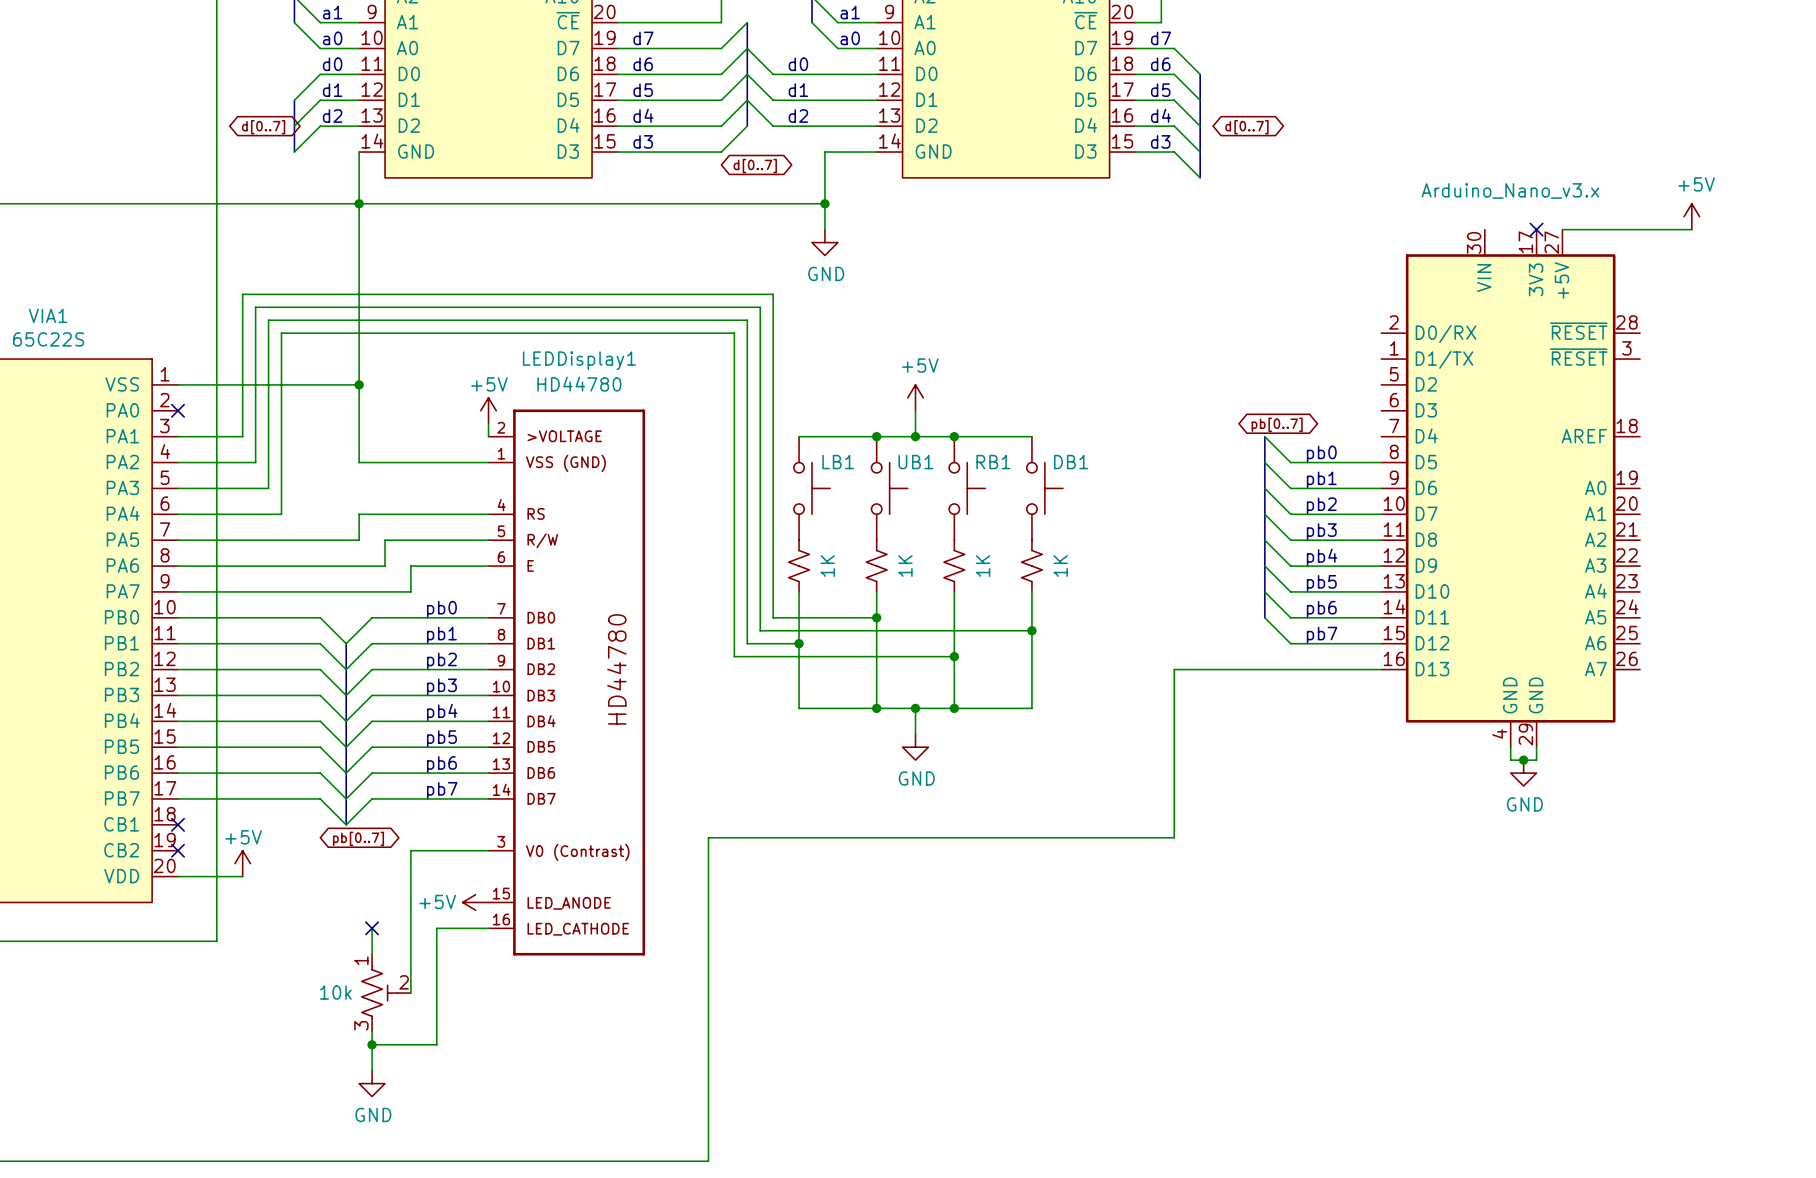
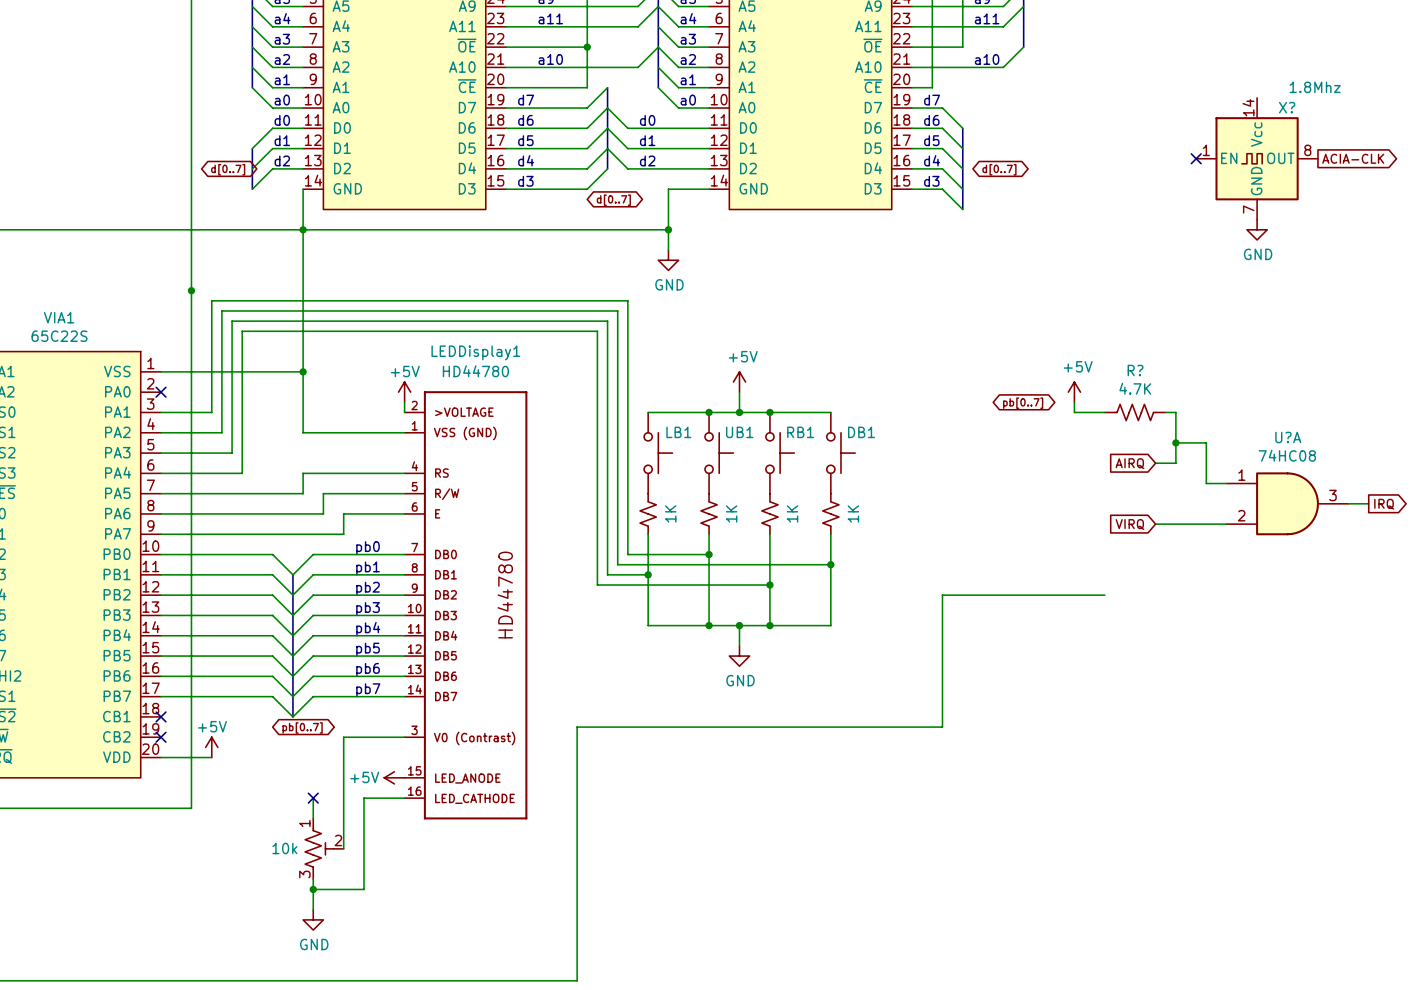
no-connect mark: none -> (1196, 158)
X?: none -> 1.8Mhz (1257, 158)
global label: none -> ACIA-CLK (1353, 158)
power symbol: none -> GND (1257, 229)
power symbol: +5V (1691, 216) -> none
no-connect mark: (1536, 229) -> none
wire: (1562, 229) (1691, 229) -> none
junction: none -> (191, 290)
power symbol: none -> +5V (1074, 392)
wire: none -> (1074, 402) (1074, 412) (1104, 412)
wire: (1264, 436) (1290, 462) (1381, 462) -> none
bus: (1264, 436) (1264, 617) -> none
R?: none -> 4.7K (1135, 412)
text: pb0 (1321, 454) -> none
wire: (1264, 462) (1290, 488) (1381, 488) -> none
junction: none -> (1175, 442)
text: pb1 (1321, 480) -> none
wire: (1264, 488) (1290, 514) (1381, 514) -> none
part: Arduino_Nano_v3.x (1510, 488) -> none
global label: none -> AIRQ (1130, 463)
text: pb2 (1321, 506) -> none
wire: (1264, 514) (1290, 540) (1381, 540) -> none
text: pb3 (1321, 532) -> none
wire: (1264, 540) (1290, 566) (1381, 566) -> none
U?A: none -> 74HC08 (1287, 503)
wire: none -> (1348, 503) (1368, 503)
global label: none -> IRQ (1384, 504)
text: pb4 (1322, 557) -> none
wire: (1264, 566) (1290, 591) (1381, 591) -> none
global label: none -> VIRQ (1130, 524)
text: pb5 (1321, 583) -> none
wire: (1264, 591) (1290, 617) (1381, 617) -> none
text: pb6 (1321, 609) -> none
wire: (1264, 617) (1290, 643) (1381, 643) -> none
text: pb7 (1322, 635) -> none
wire: (1510, 747) (1510, 760) (1536, 760) (1536, 747) -> none
junction: (1523, 760) -> none
power symbol: GND (1523, 773) -> none

